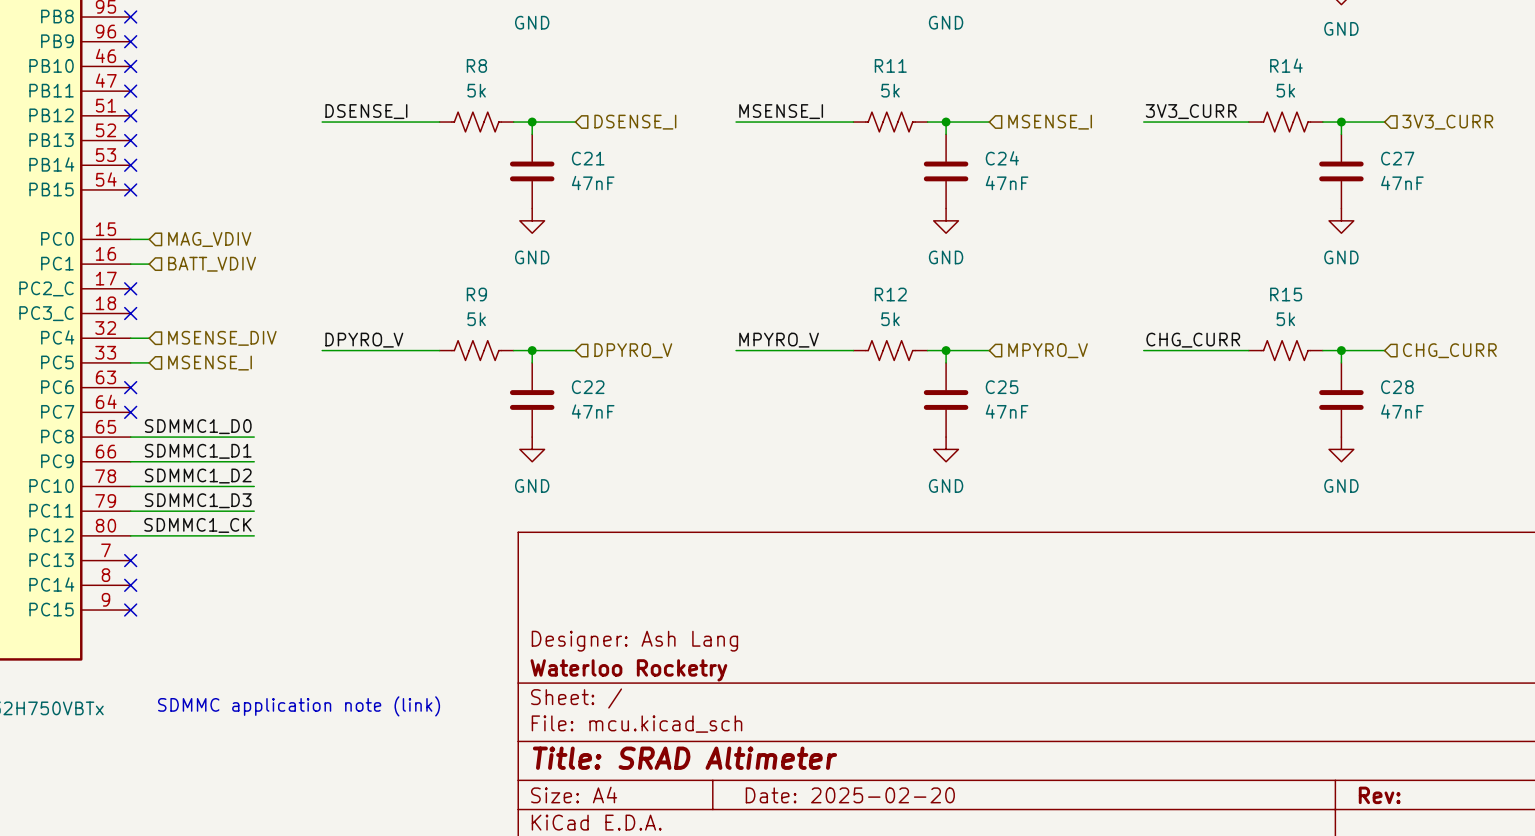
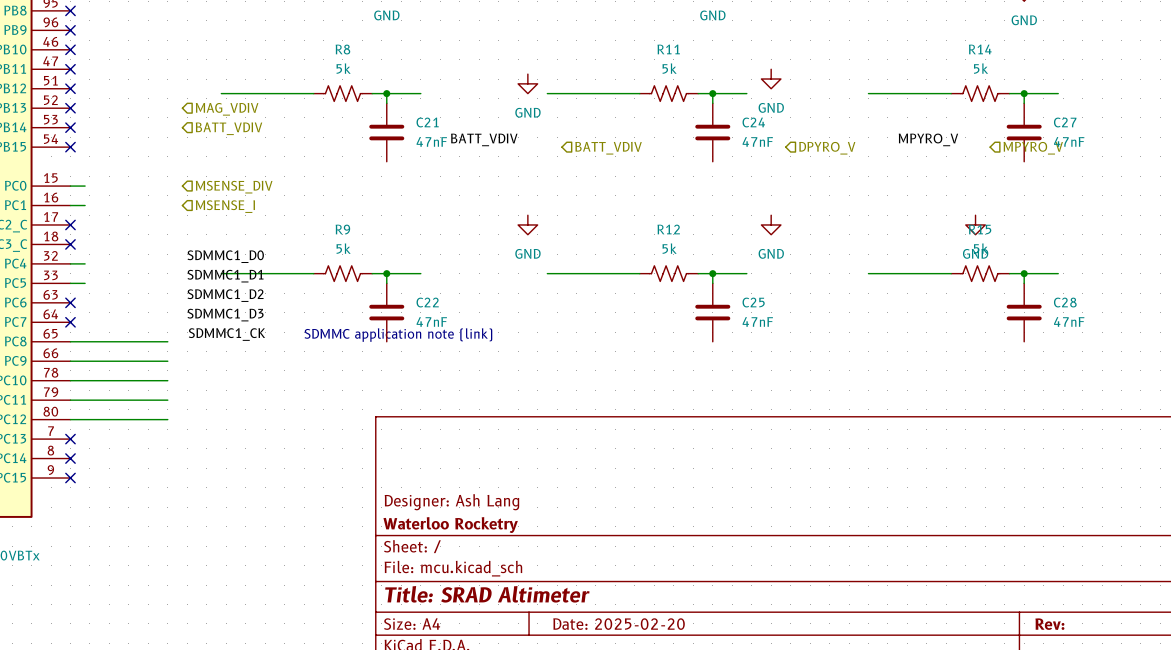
power symbol: none -> GND (771, 79)
power symbol: none -> GND (527, 83)
label: DSENSE_I (366, 111) -> none
label: MSENSE_I (781, 111) -> none
label: 3V3_CURR (1191, 111) -> none
hierarchical label: DSENSE_I (635, 122) -> none
hierarchical label: MSENSE_I (1050, 122) -> none
hierarchical label: 3V3_CURR (1447, 122) -> none
label: none -> BATT_VDIV (484, 139)
label: none -> MPYRO_V (928, 139)
hierarchical label: none -> BATT_VDIV (608, 148)
hierarchical label: none -> DPYRO_V (827, 148)
hierarchical label: none -> MPYRO_V (1033, 148)
power symbol: GND (532, 220) -> none
power symbol: GND (946, 220) -> none
power symbol: GND (1341, 220) -> none
hierarchical label position: MAG_VDIV (209, 239) -> MAG_VDIV (227, 109)
hierarchical label position: BATT_VDIV (212, 264) -> BATT_VDIV (229, 128)
power symbol: none -> GND (527, 224)
power symbol: none -> GND (771, 224)
power symbol: none -> GND (975, 224)
hierarchical label position: MSENSE_DIV (222, 338) -> MSENSE_DIV (234, 187)
label: DPYRO_V (364, 340) -> none
label: MPYRO_V (779, 340) -> none
label: CHG_CURR (1193, 340) -> none
hierarchical label: DPYRO_V (633, 350) -> none
hierarchical label: MPYRO_V (1048, 350) -> none
hierarchical label: CHG_CURR (1449, 350) -> none
hierarchical label position: MSENSE_I (210, 363) -> MSENSE_I (225, 206)
label position: SDMMC1_D0 (198, 426) -> SDMMC1_D0 (225, 256)
text: none -> SDMMC application note (link) (398, 335)
power symbol: GND (532, 449) -> none
power symbol: GND (946, 449) -> none
power symbol: GND (1341, 449) -> none
label position: SDMMC1_D1 (198, 451) -> SDMMC1_D1 (225, 276)
label position: SDMMC1_D2 (198, 476) -> SDMMC1_D2 (225, 295)
label position: SDMMC1_D3 (198, 500) -> SDMMC1_D3 (225, 315)
label position: SDMMC1_CK (197, 525) -> SDMMC1_CK (226, 334)
text: SDMMC application note (link) (299, 706) -> none

